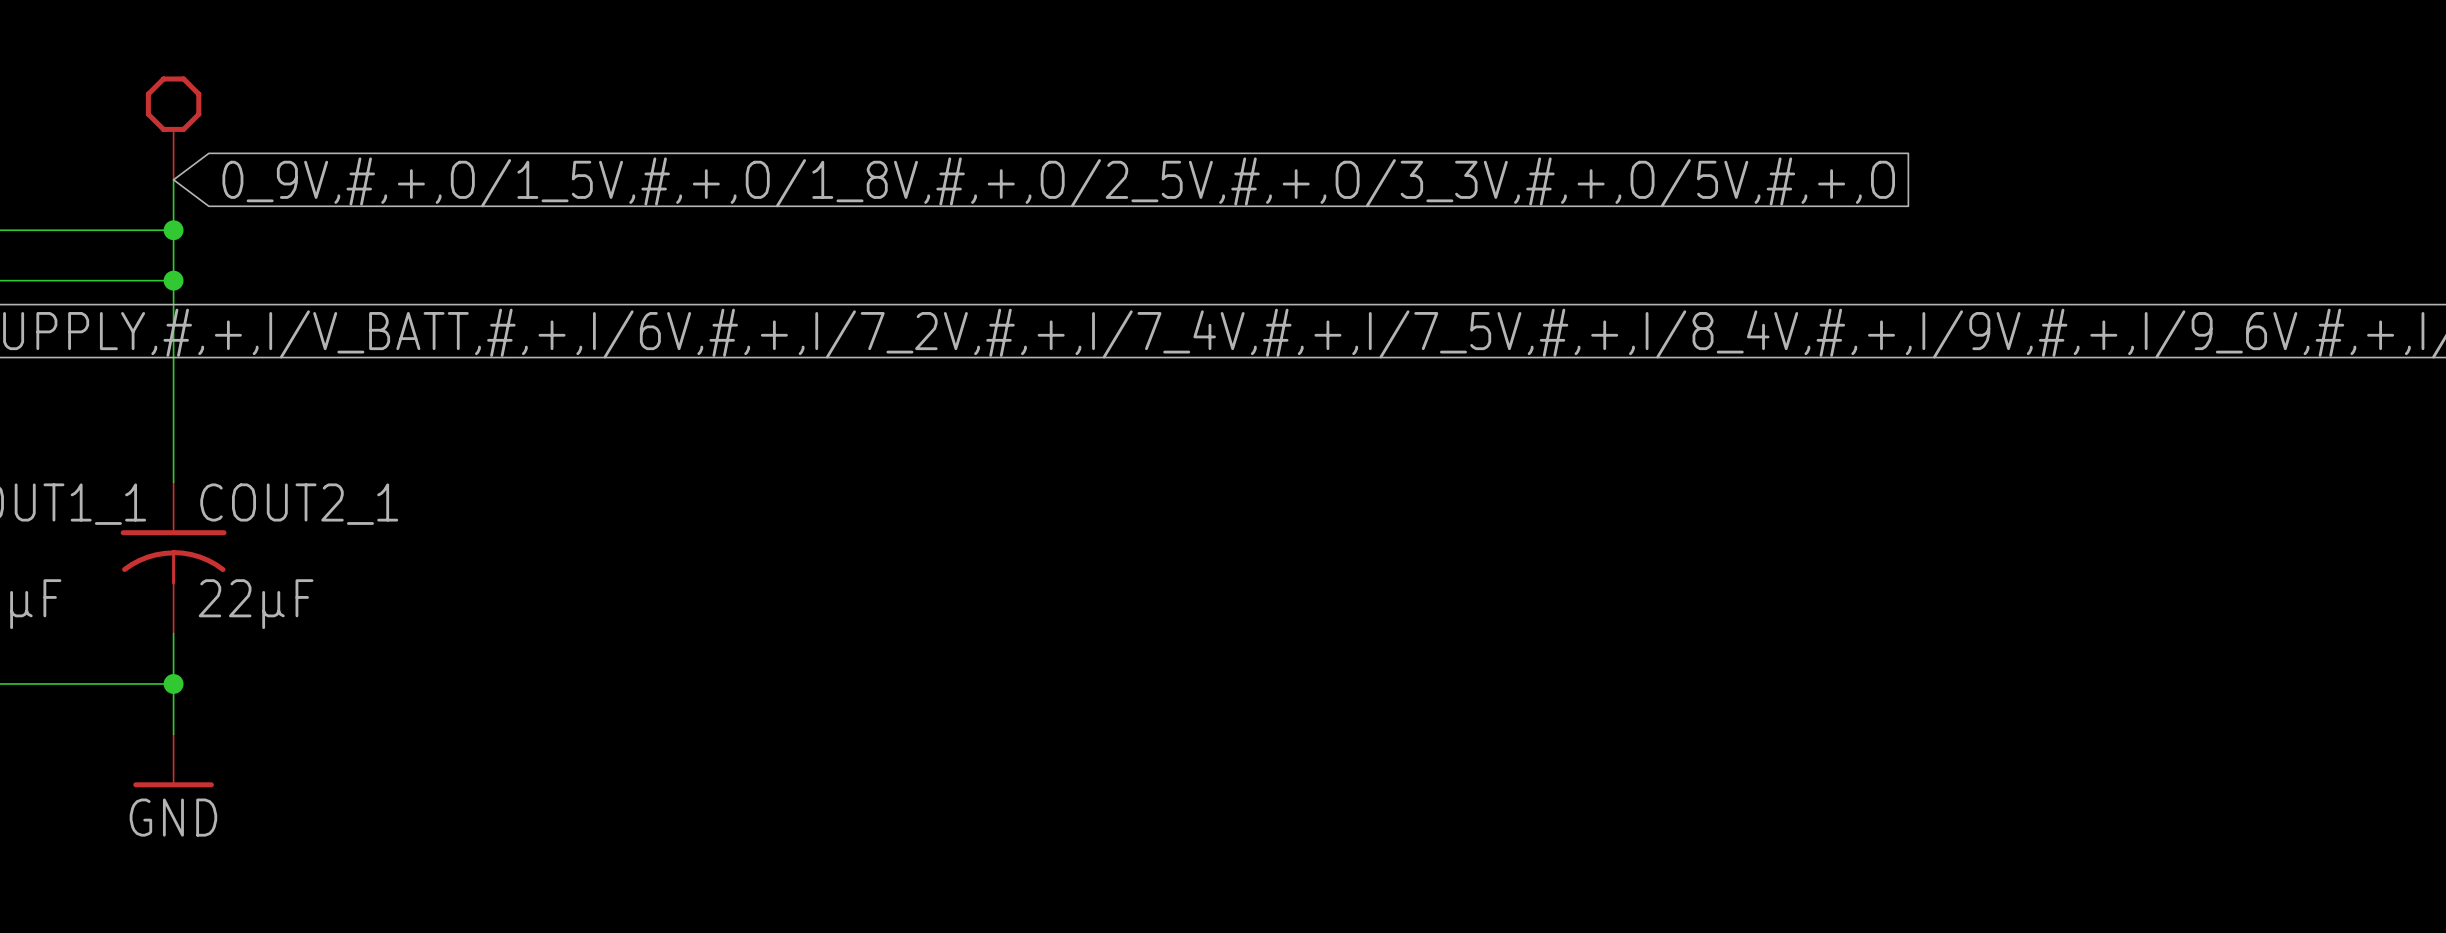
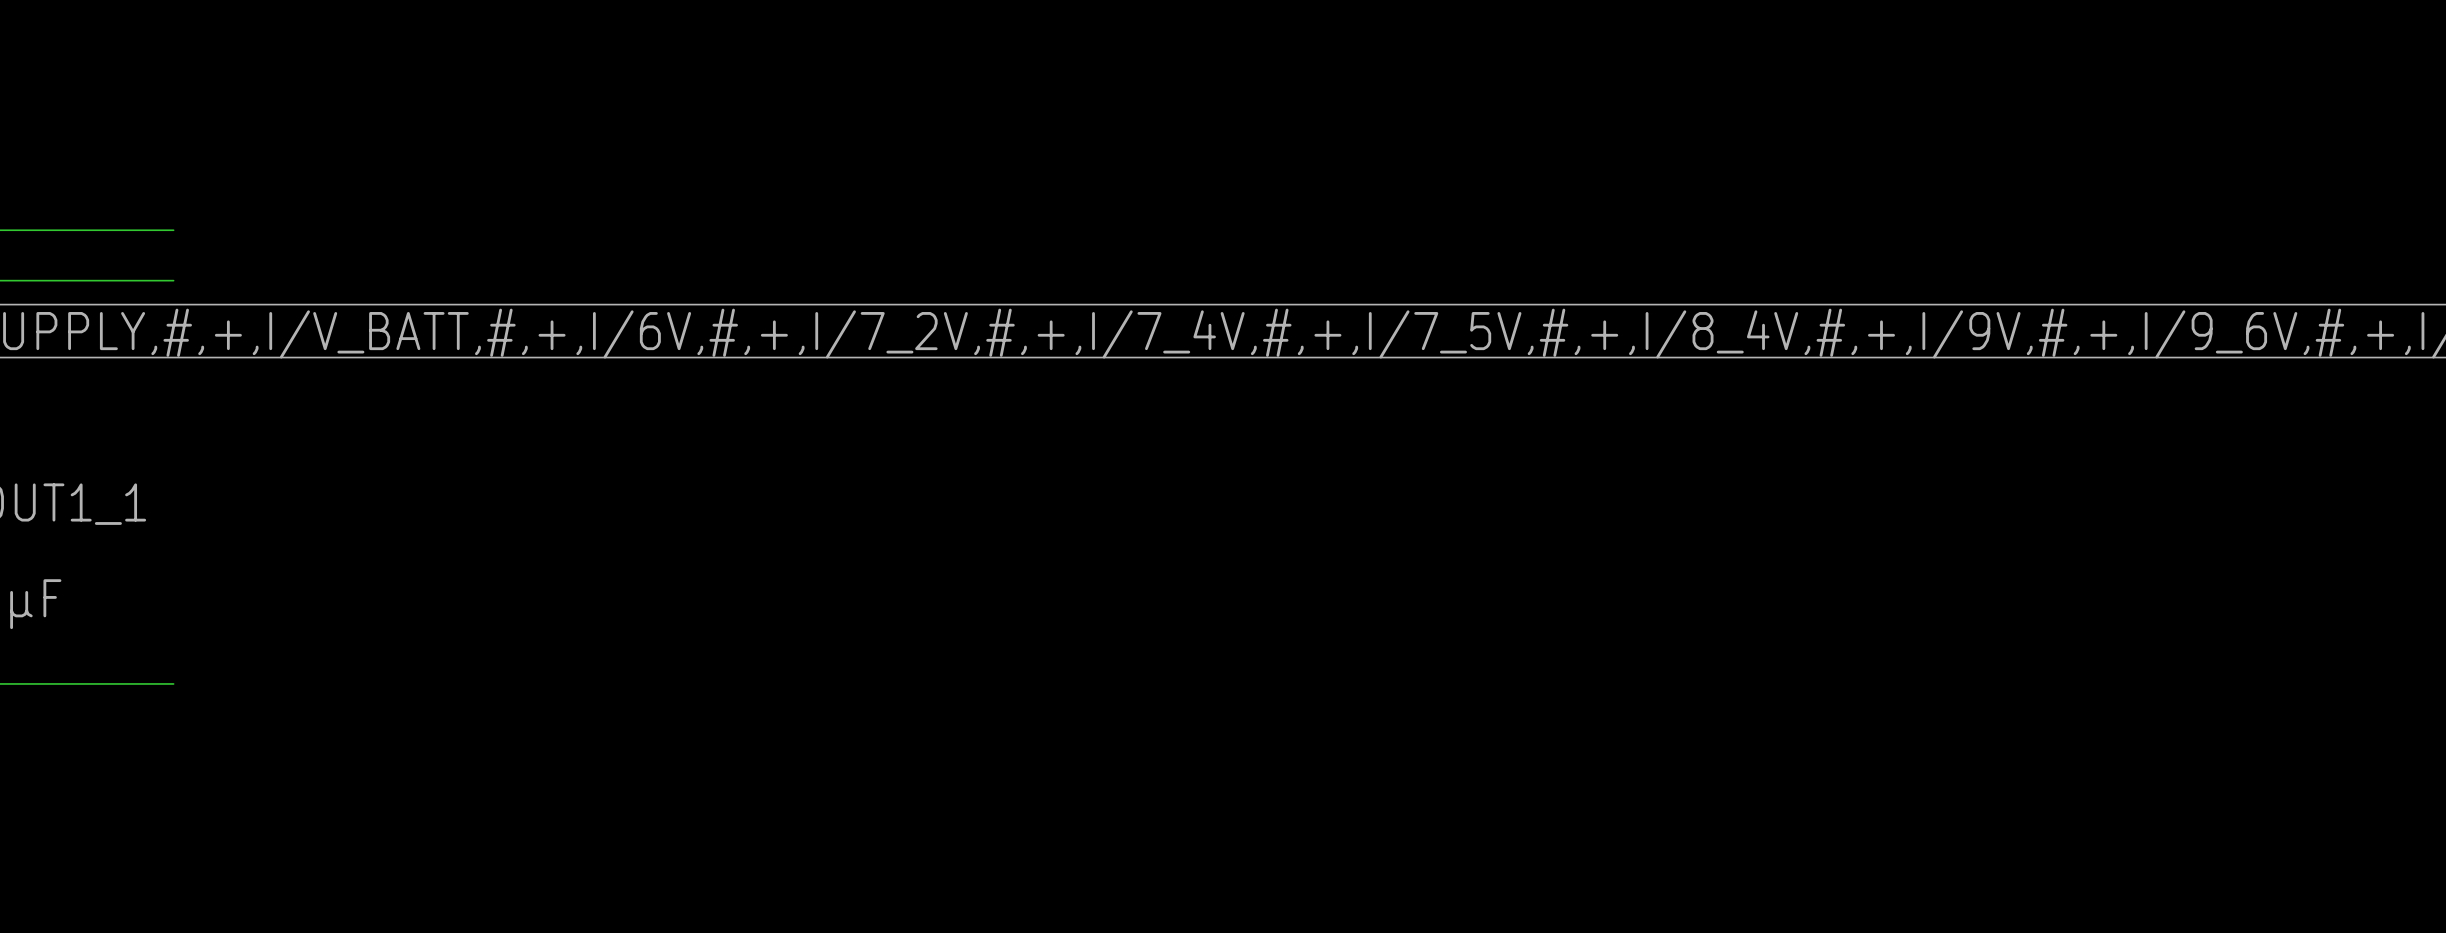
power symbol: (173, 128) -> none
wire: (173, 179) (173, 482) -> none
global label: 0_9V,#,+,O/1_5V,#,+,O/1_8V,#,+,O/2_5V,#,+,O/3_3V,#,+,O/5V,#,+,O (1058, 182) -> none
junction: (173, 230) -> none
junction: (173, 280) -> none
COUT2_1: 22µF (173, 557) -> none
wire: (173, 633) (173, 734) -> none
junction: (173, 683) -> none
power symbol: GND (173, 760) -> none

